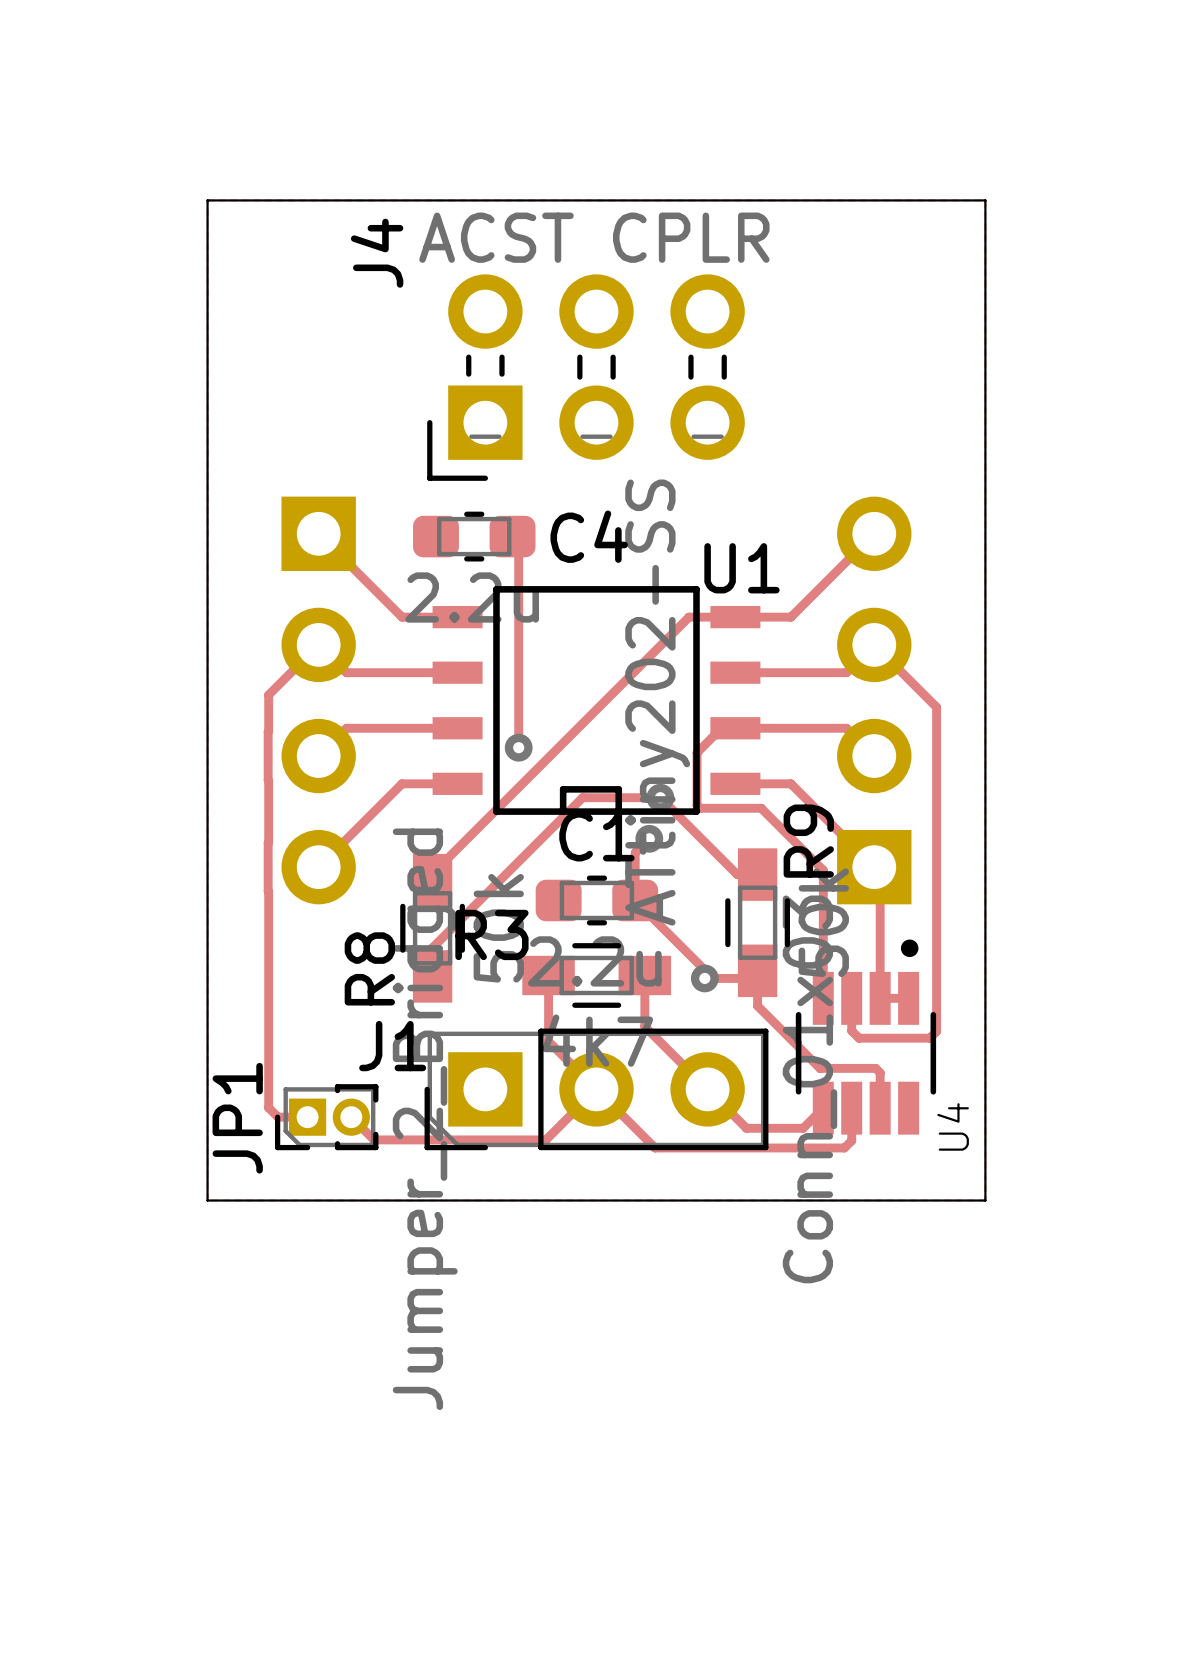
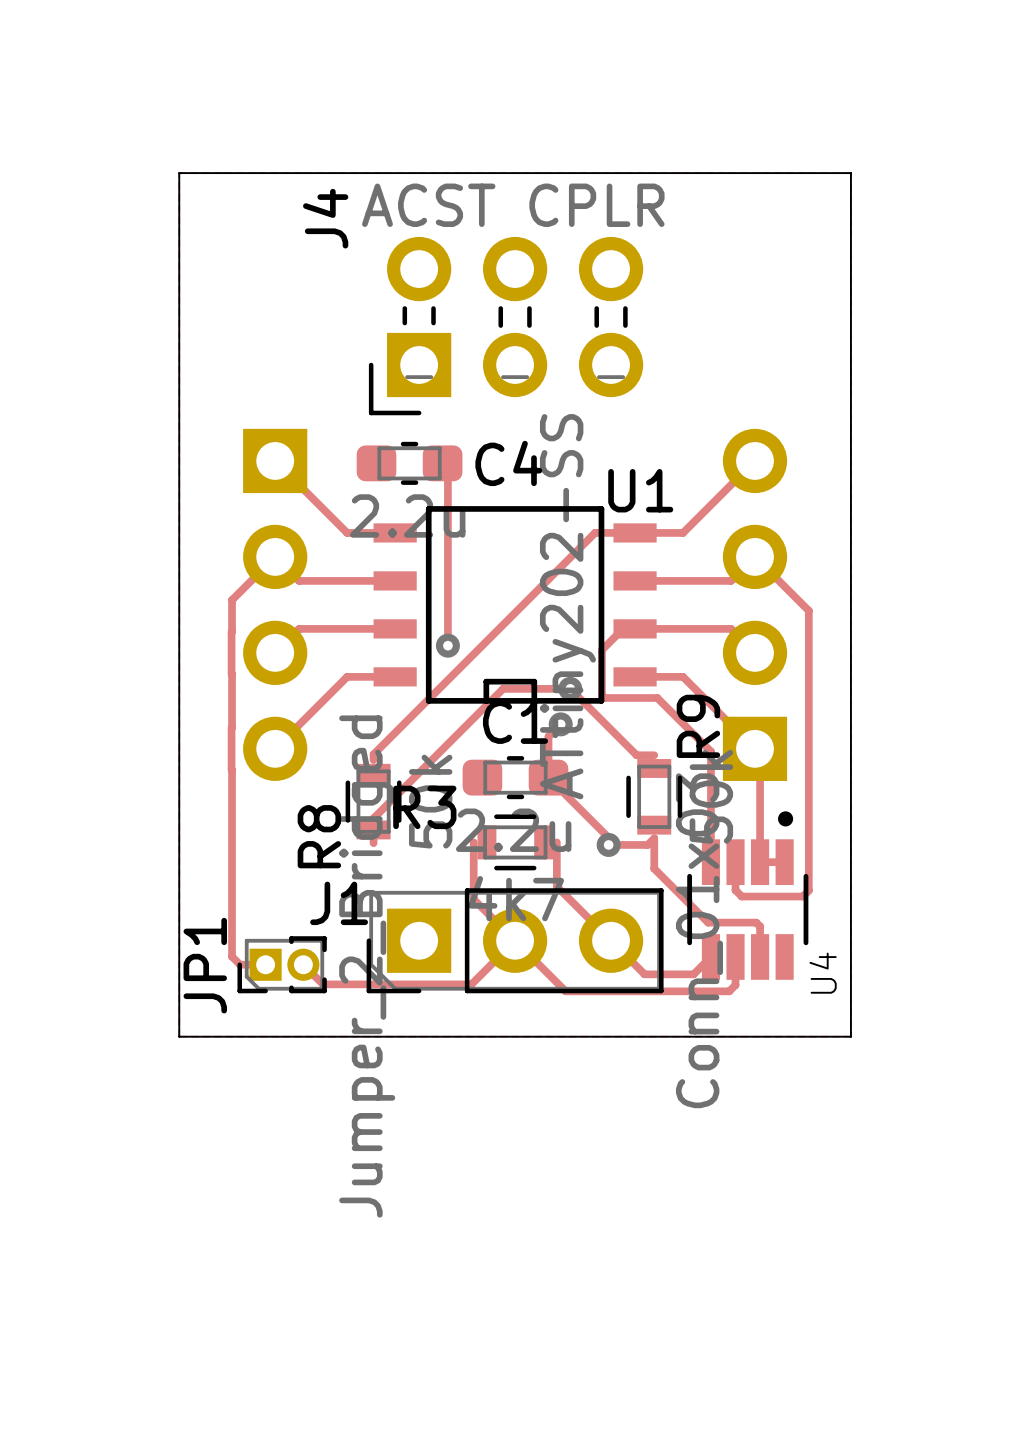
R9 footprint: [725, 848, 790, 998] -> [626, 759, 683, 835]
R8 footprint: [400, 853, 465, 1003] -> [345, 763, 402, 840]
R3 footprint: [522, 943, 672, 1008] -> [477, 814, 554, 871]

